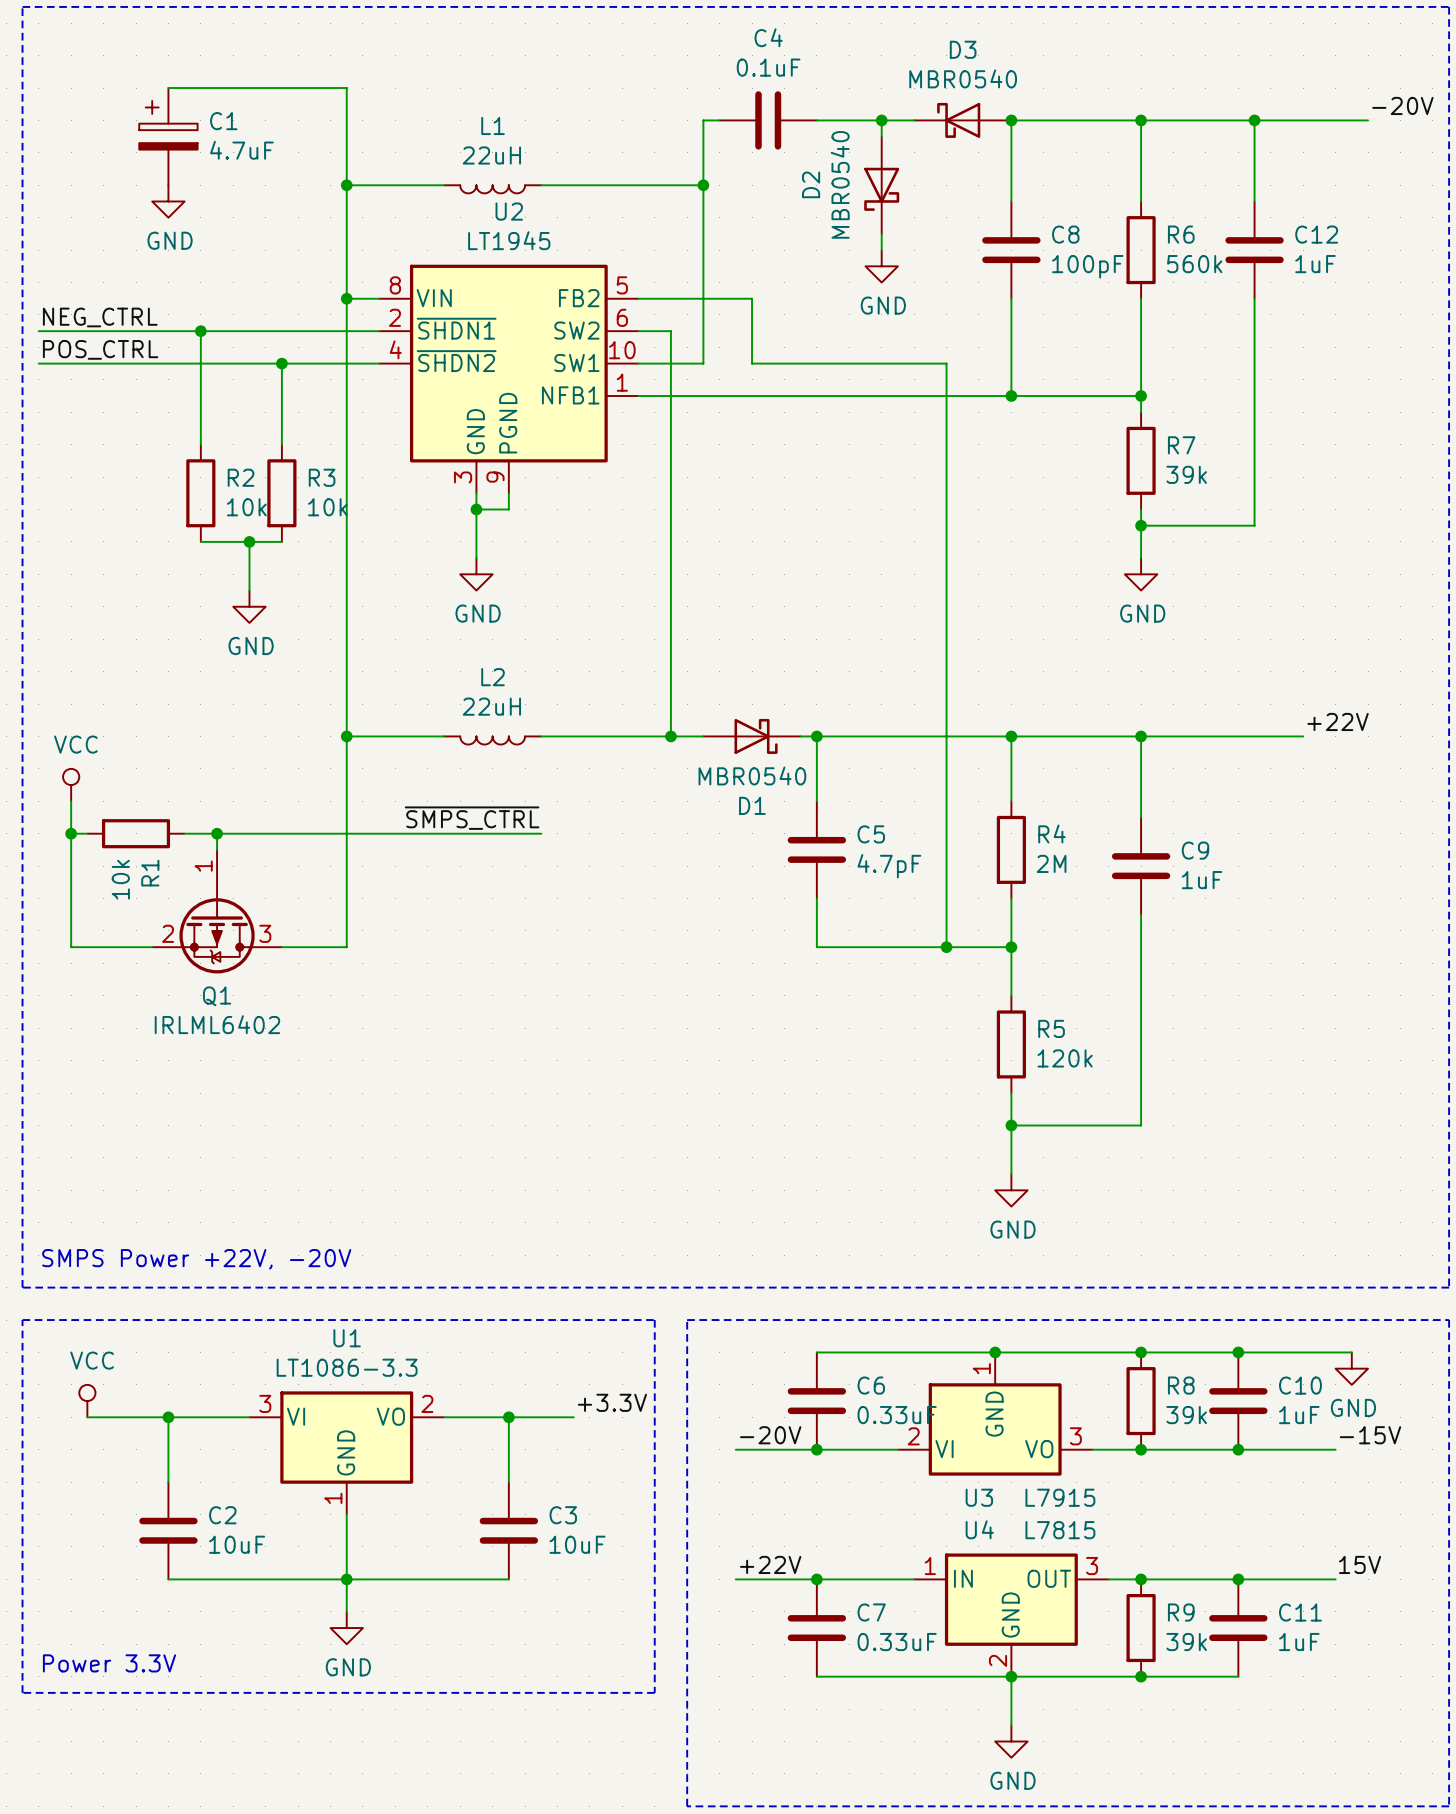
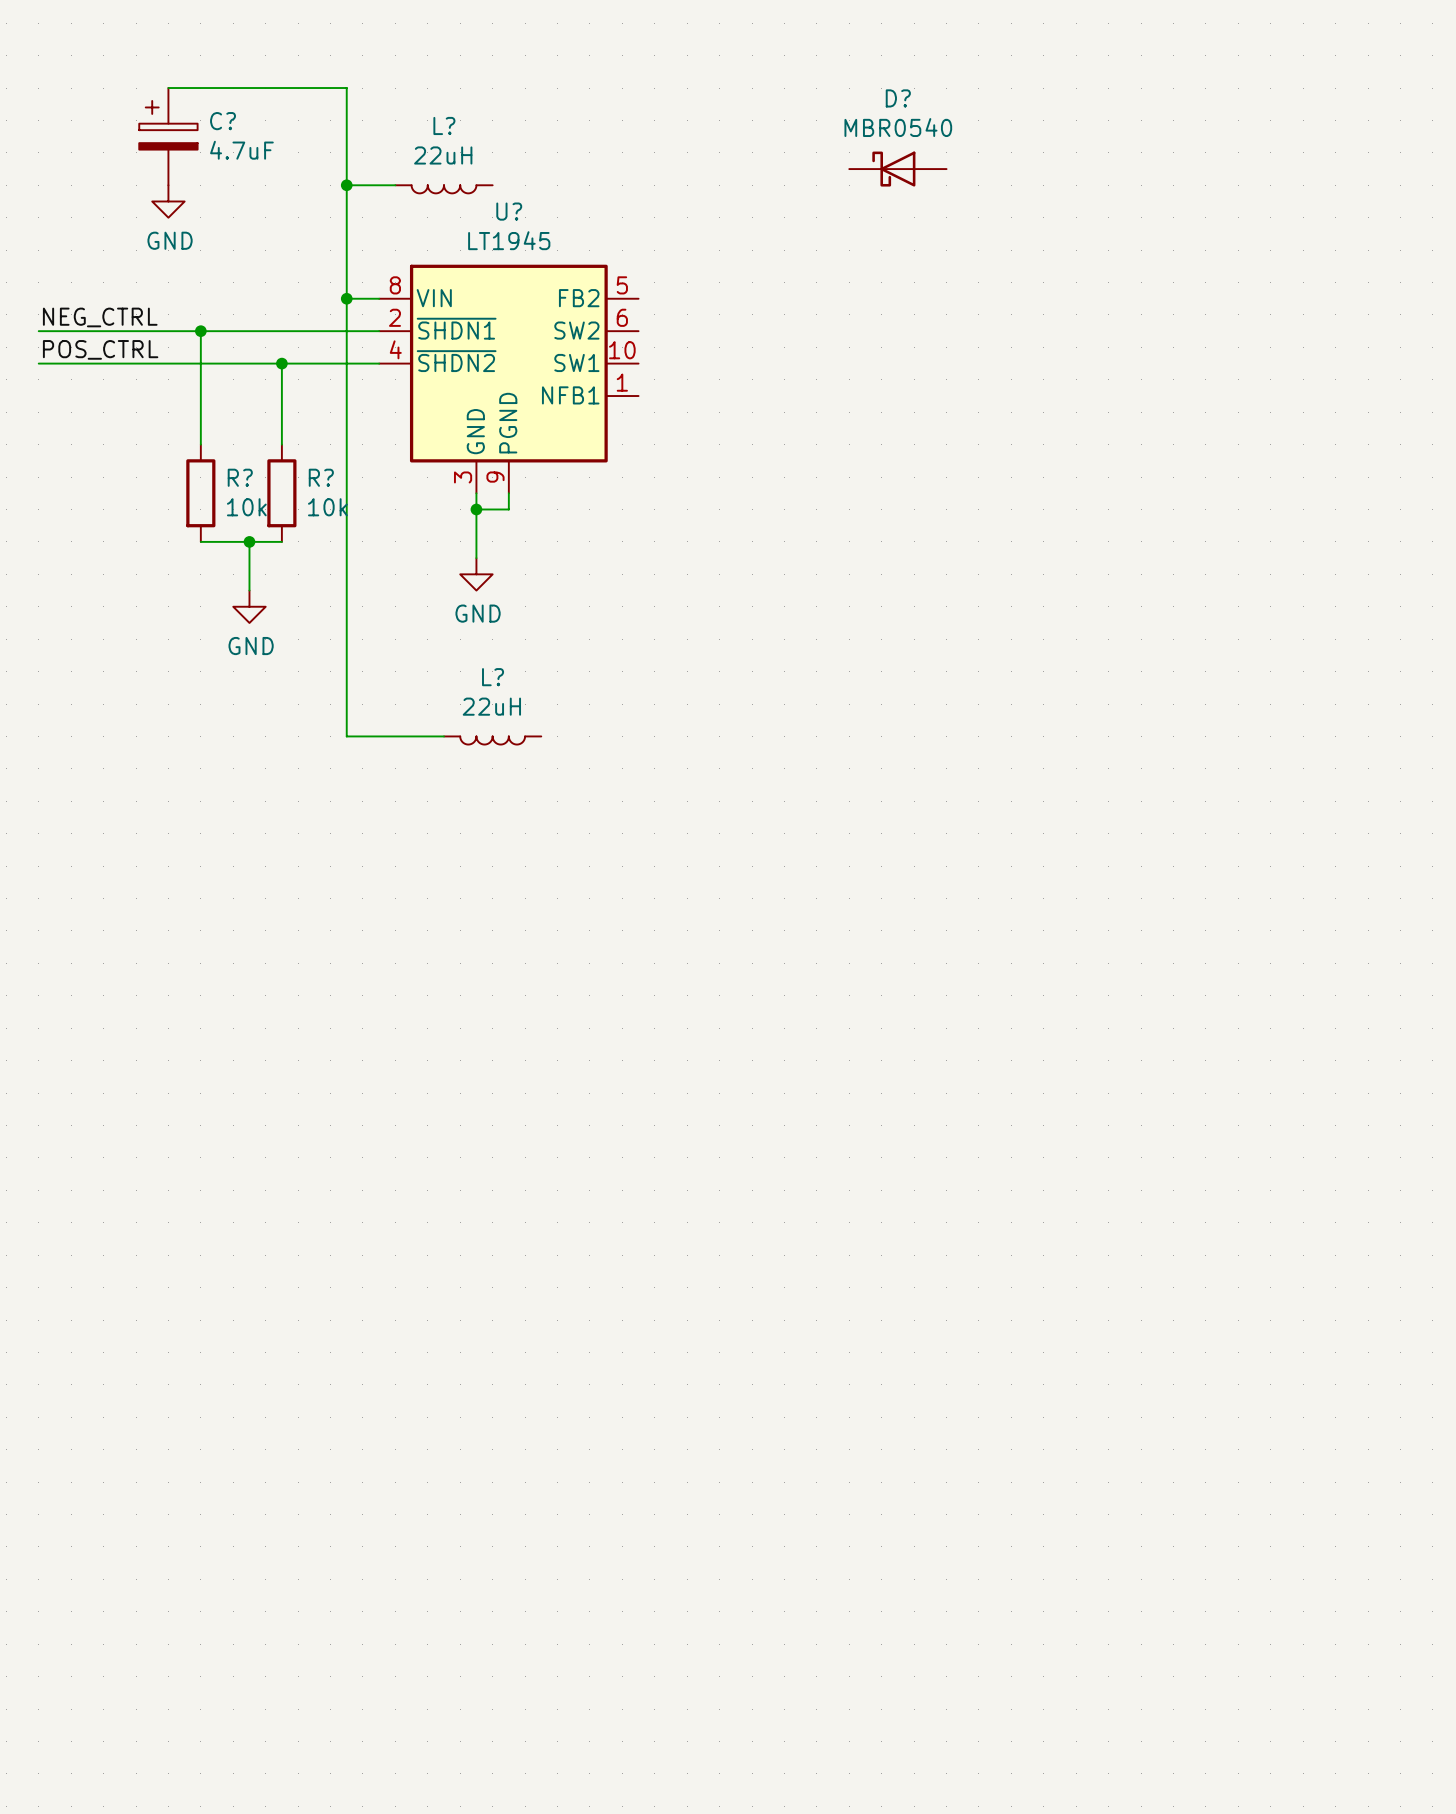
line: (22, 6) (1449, 6) (1449, 1287) (22, 1287) (22, 6) -> none
label: -20V (1402, 105) -> none
wire: (719, 120) (703, 120) (703, 363) (638, 363) -> none
C4: 0.1uF (768, 120) -> none
wire: (816, 120) (914, 120) -> none
wire: (881, 120) (881, 136) -> none
junction: (881, 120) -> none
D3: MBR0540 (962, 120) -> none
junction: (1011, 120) -> none
wire: (1141, 120) (1141, 201) -> none
junction: (1141, 120) -> none
wire: (1254, 120) (1254, 201) -> none
junction: (1254, 120) -> none
wire: (1368, 120) (1011, 120) (1011, 201) -> none
C1 name: C1 (223, 121) -> C? (223, 121)
D?: none -> MBR0540 (897, 169)
wire: (395, 185) (444, 185) -> none
wire: (541, 185) (703, 185) -> none
junction: (703, 185) -> none
D2: MBR0540 (881, 185) -> none
L?: none -> 22uH (444, 189)
L1: 22uH (492, 189) -> none
U2 name: U2 (509, 211) -> U? (509, 211)
wire: (881, 233) (881, 250) -> none
C8: 100pF (1011, 250) -> none
R6: 560k (1141, 250) -> none
C12: 1uF (1254, 250) -> none
power symbol: GND (881, 266) -> none
wire: (638, 298) (752, 298) (752, 363) (946, 363) (946, 947) -> none
wire: (1011, 298) (1011, 396) -> none
wire: (1141, 298) (1141, 412) -> none
wire: (1254, 298) (1254, 525) (1141, 525) -> none
wire: (638, 331) (670, 331) (670, 736) -> none
wire: (638, 396) (1141, 396) -> none
junction: (1011, 396) -> none
junction: (1141, 396) -> none
R7: 39k (1141, 460) -> none
R2 name: R2 (241, 477) -> R? (240, 477)
R3 name: R3 (322, 477) -> R? (321, 477)
wire: (1141, 509) (1141, 558) -> none
junction: (1141, 525) -> none
power symbol: GND (1141, 574) -> none
L2 name: L2 (493, 677) -> L? (493, 677)
label: +22V (1338, 721) -> none
wire: (346, 736) (346, 947) (281, 947) -> none
junction: (346, 736) -> none
wire: (541, 736) (703, 736) -> none
junction: (670, 736) -> none
D1: MBR0540 (752, 736) -> none
wire: (800, 736) (1303, 736) -> none
wire: (816, 736) (816, 801) -> none
junction: (816, 736) -> none
wire: (1011, 736) (1011, 801) -> none
junction: (1011, 736) -> none
wire: (1141, 736) (1141, 817) -> none
junction: (1141, 736) -> none
power symbol: VCC (71, 785) -> none
wire: (71, 801) (71, 947) (152, 947) -> none
label: ~{SMPS_CTRL} (472, 818) -> none
wire: (71, 833) (87, 833) -> none
junction: (71, 833) -> none
R1: 10k (136, 833) -> none
wire: (184, 833) (541, 833) -> none
wire: (217, 833) (217, 849) -> none
junction: (217, 833) -> none
C5: 4.7pF (816, 849) -> none
R4: 2M (1011, 849) -> none
C9: 1uF (1141, 866) -> none
wire: (816, 898) (816, 947) (1011, 947) -> none
wire: (1011, 898) (1011, 995) -> none
Q1: IRLML6402 (217, 911) -> none
wire: (1141, 914) (1141, 1125) (1011, 1125) -> none
junction: (946, 947) -> none
junction: (1011, 947) -> none
R5: 120k (1011, 1044) -> none
wire: (1011, 1093) (1011, 1174) -> none
junction: (1011, 1125) -> none
power symbol: GND (1011, 1190) -> none
text: SMPS Power +22V, -20V (196, 1259) -> none
line: (22, 1320) (22, 1692) (654, 1692) (654, 1320) (22, 1320) -> none
line: (687, 1320) (1449, 1320) (1449, 1806) (687, 1806) (687, 1320) -> none
wire: (816, 1352) (1351, 1352) -> none
junction: (995, 1352) -> none
junction: (1141, 1352) -> none
junction: (1238, 1352) -> none
power symbol: GND (1351, 1368) -> none
power symbol: VCC (87, 1401) -> none
C6: 0.33uF (816, 1401) -> none
R8: 39k (1141, 1401) -> none
C10: 1uF (1238, 1401) -> none
label: +3.3V (612, 1402) -> none
U3: L7915 (995, 1414) -> none
wire: (87, 1417) (249, 1417) -> none
wire: (168, 1417) (168, 1482) -> none
junction: (168, 1417) -> none
wire: (444, 1417) (573, 1417) -> none
wire: (508, 1417) (508, 1482) -> none
junction: (508, 1417) -> none
label: -20V (770, 1435) -> none
label: -15V (1370, 1435) -> none
wire: (735, 1449) (897, 1449) -> none
junction: (816, 1449) -> none
wire: (1092, 1449) (1335, 1449) -> none
junction: (1141, 1449) -> none
junction: (1238, 1449) -> none
U1: LT1086-3.3 (346, 1452) -> none
wire: (346, 1514) (346, 1611) -> none
C2: 10uF (168, 1530) -> none
C3: 10uF (508, 1530) -> none
label: +22V (770, 1564) -> none
label: 15V (1360, 1564) -> none
wire: (168, 1579) (508, 1579) -> none
junction: (346, 1579) -> none
wire: (735, 1579) (914, 1579) -> none
junction: (816, 1579) -> none
wire: (1108, 1579) (1335, 1579) -> none
junction: (1141, 1579) -> none
junction: (1238, 1579) -> none
U4: L7815 (1011, 1615) -> none
power symbol: GND (346, 1628) -> none
C7: 0.33uF (816, 1628) -> none
R9: 39k (1141, 1628) -> none
C11: 1uF (1238, 1628) -> none
text: Power 3.3V (109, 1663) -> none
wire: (816, 1676) (1238, 1676) -> none
wire: (1011, 1676) (1011, 1725) -> none
junction: (1011, 1676) -> none
junction: (1141, 1676) -> none
power symbol: GND (1011, 1741) -> none

